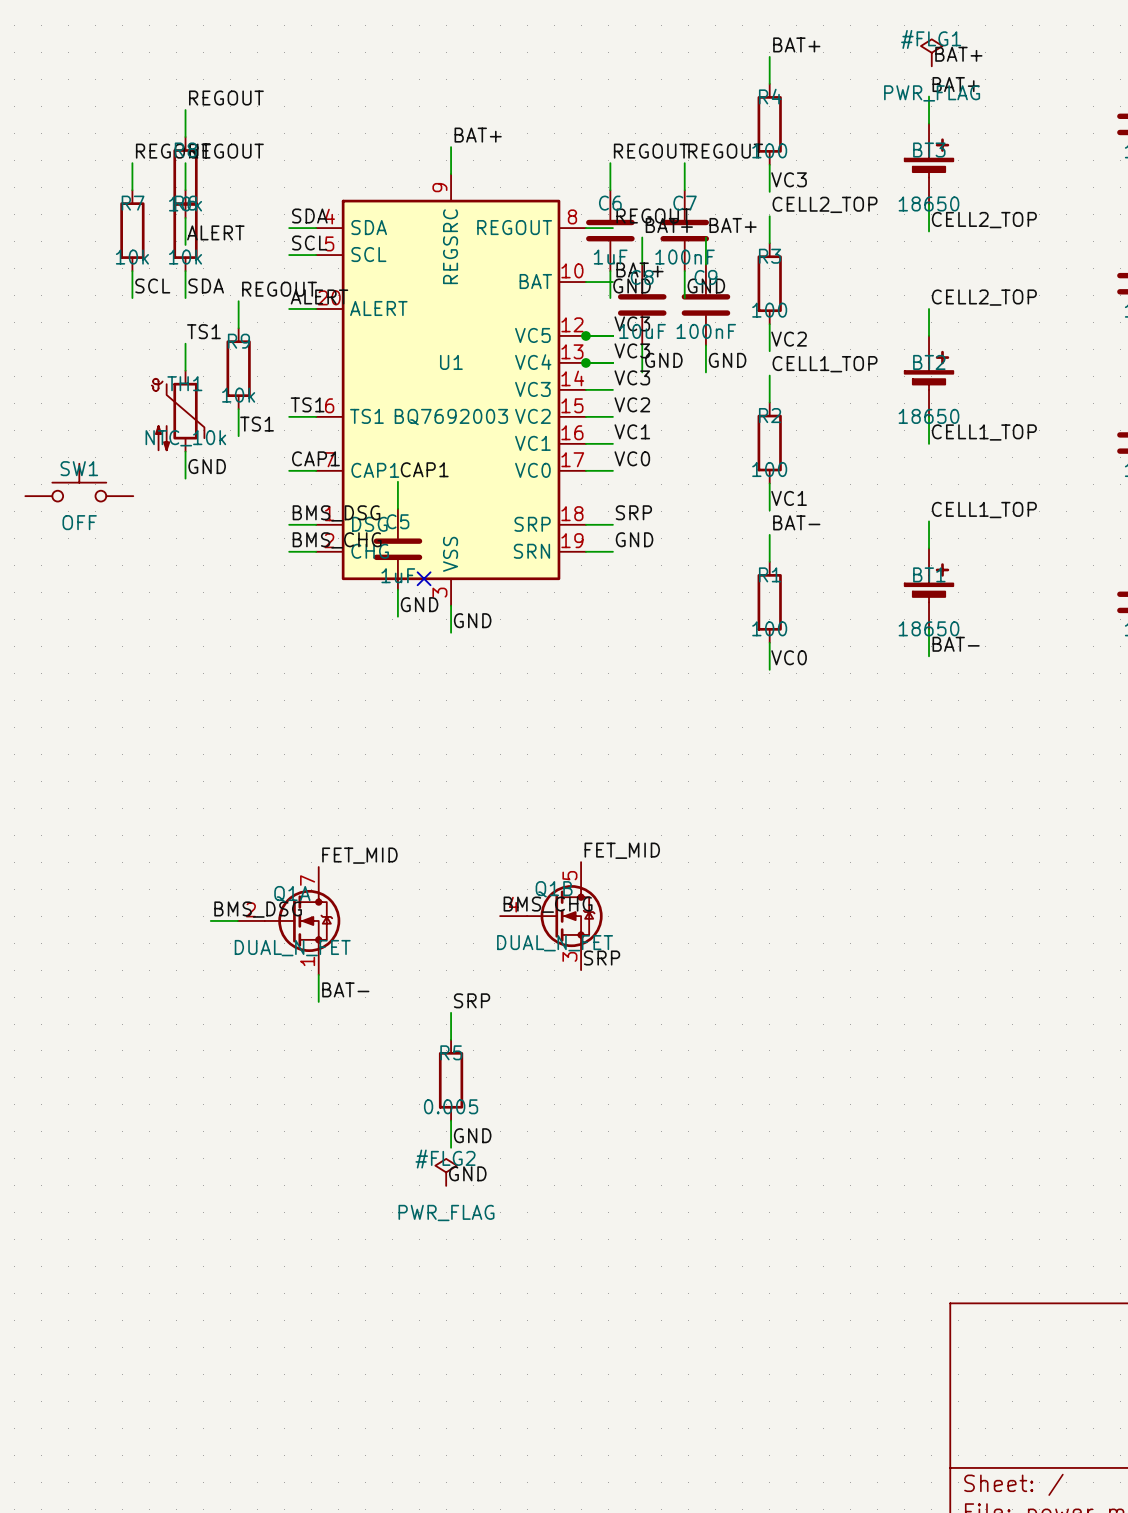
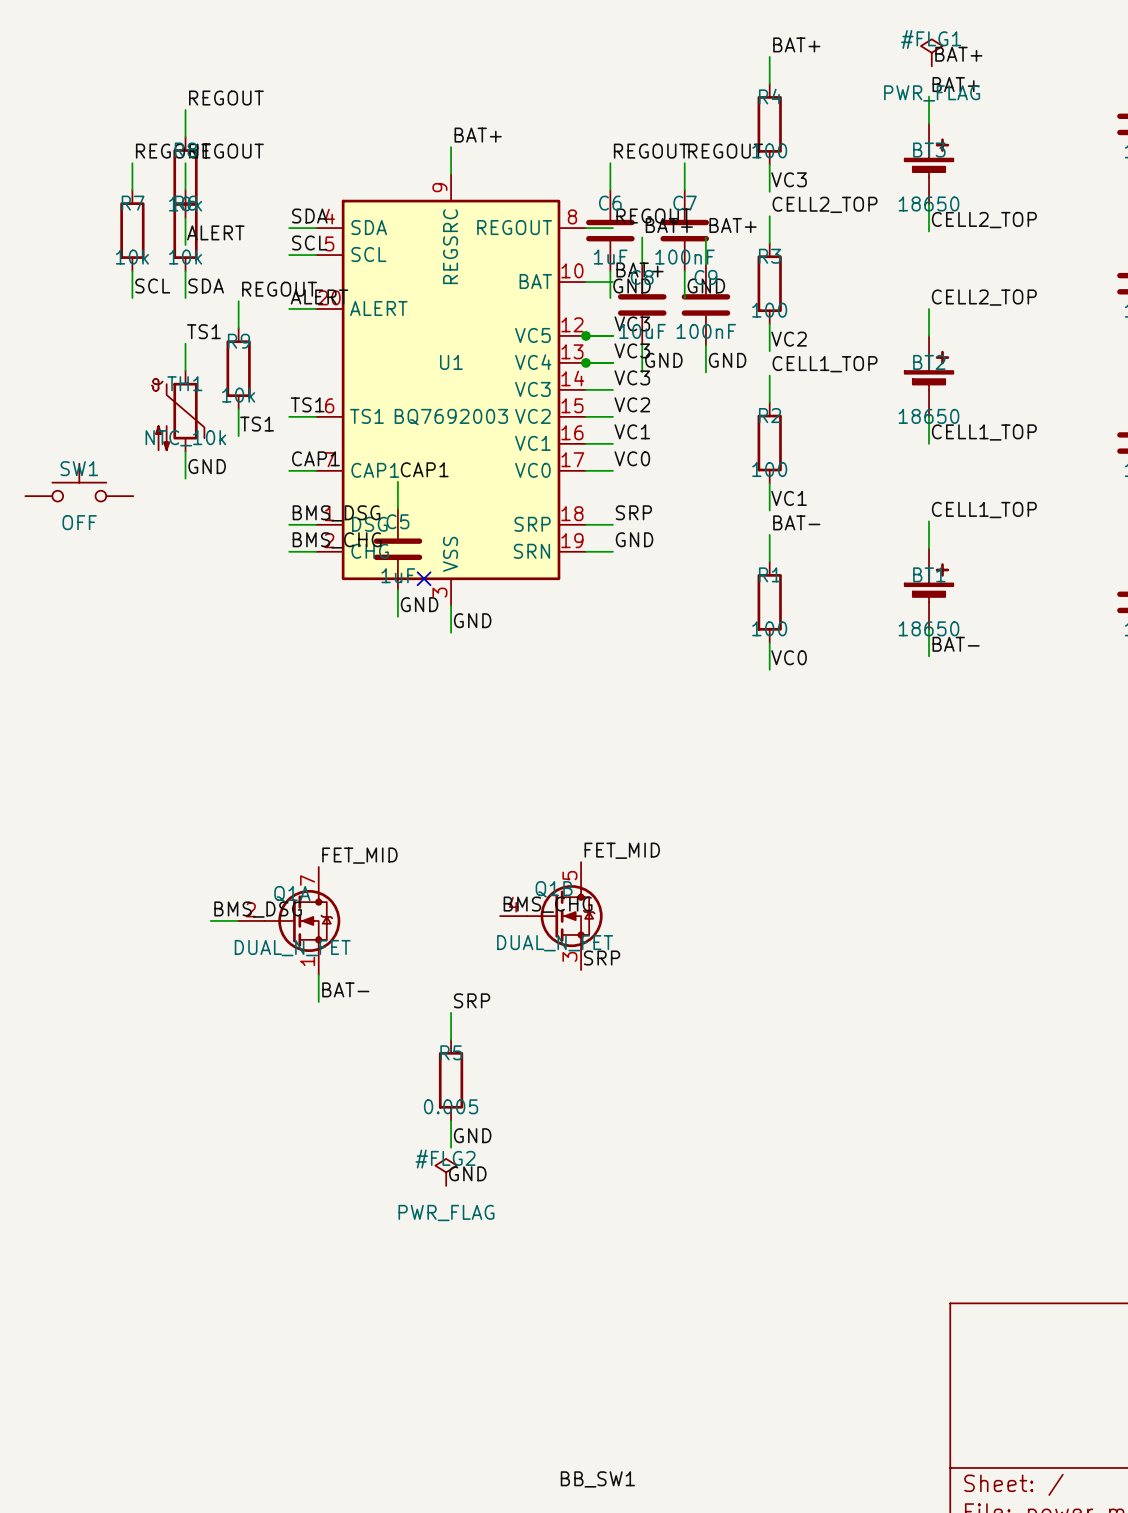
label: none -> BB_SW1 (597, 1479)

